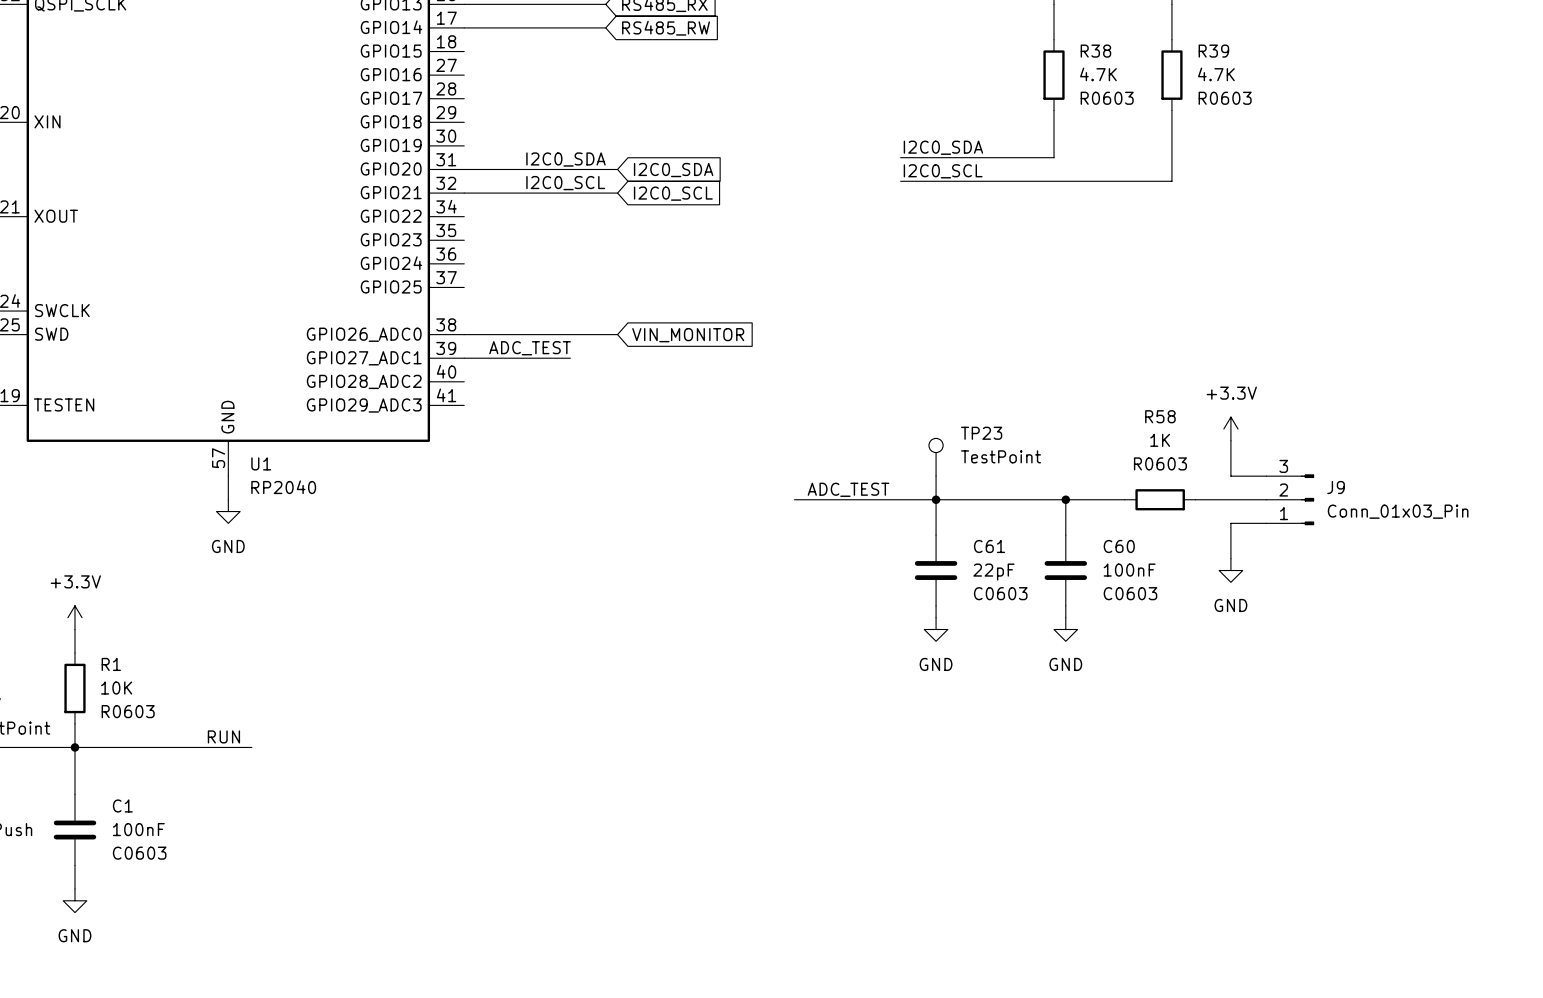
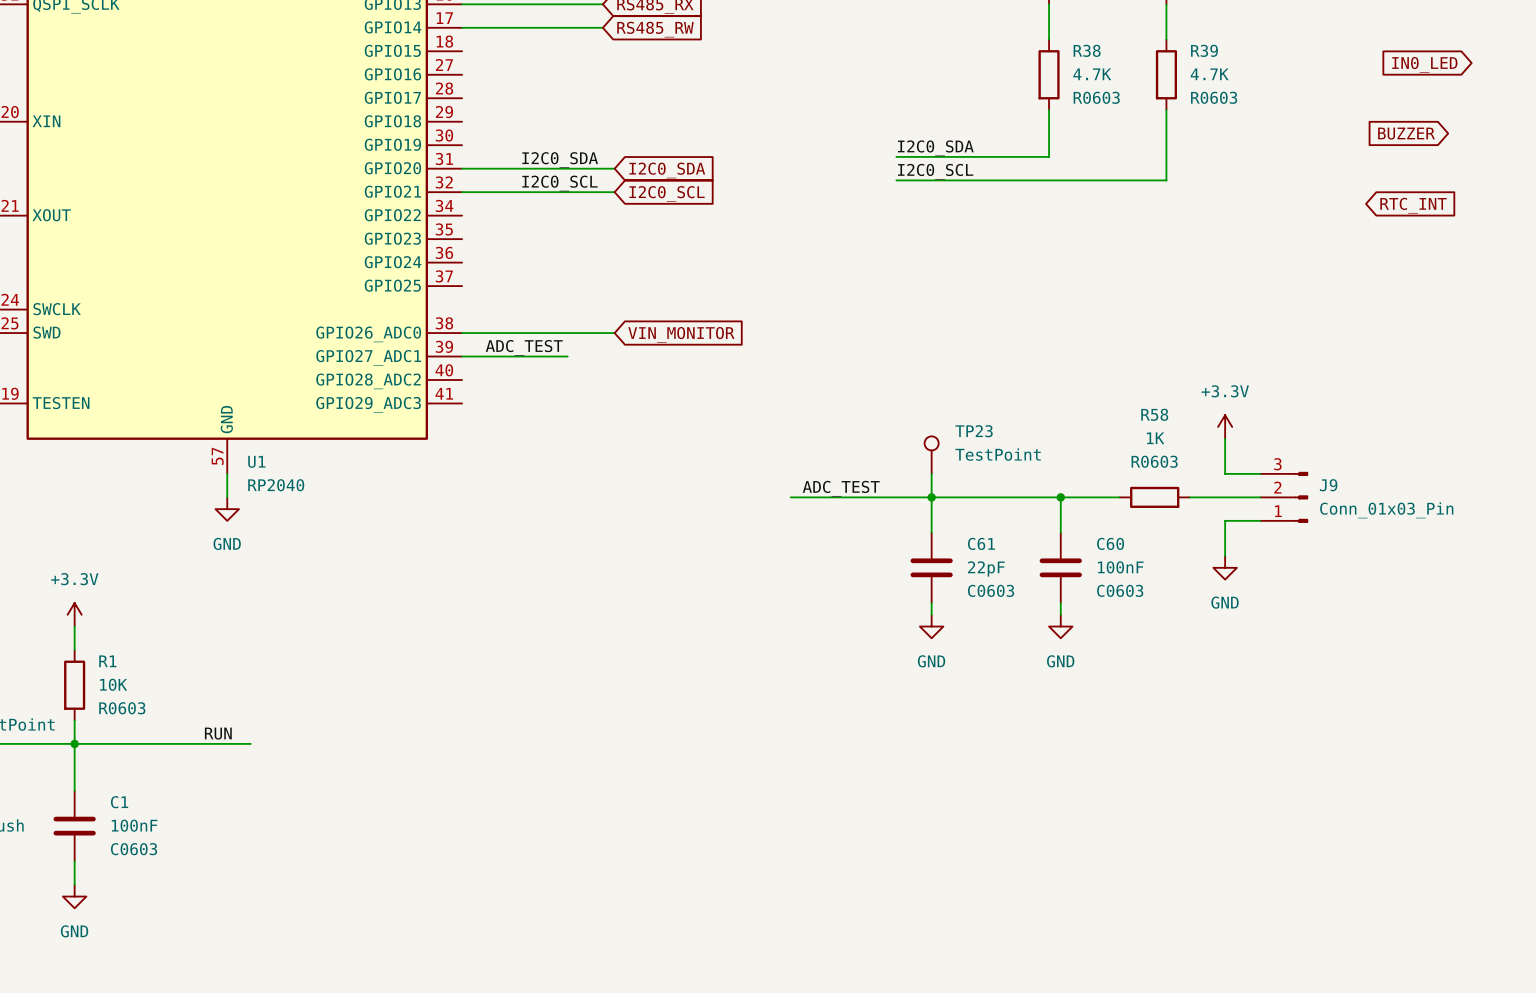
global label: none -> IN0_LED (1424, 64)
global label: none -> BUZZER (1406, 133)
global label: none -> RTC_INT (1413, 205)

